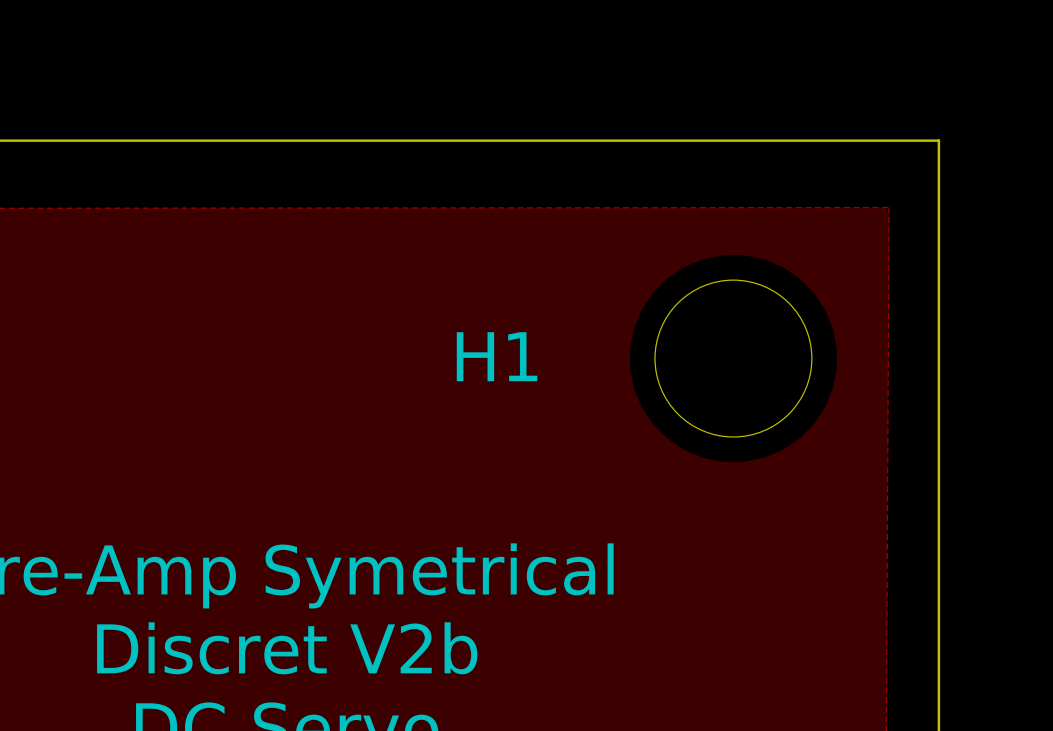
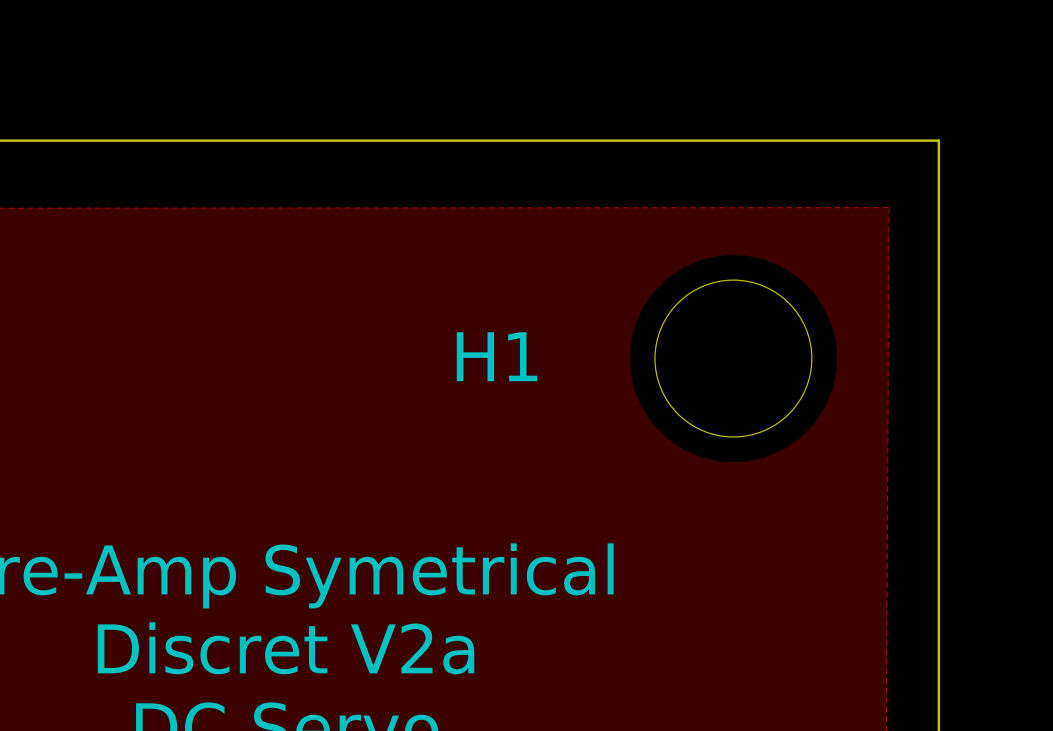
text: Discret V2b (287, 648) -> Discret V2a (286, 648)

